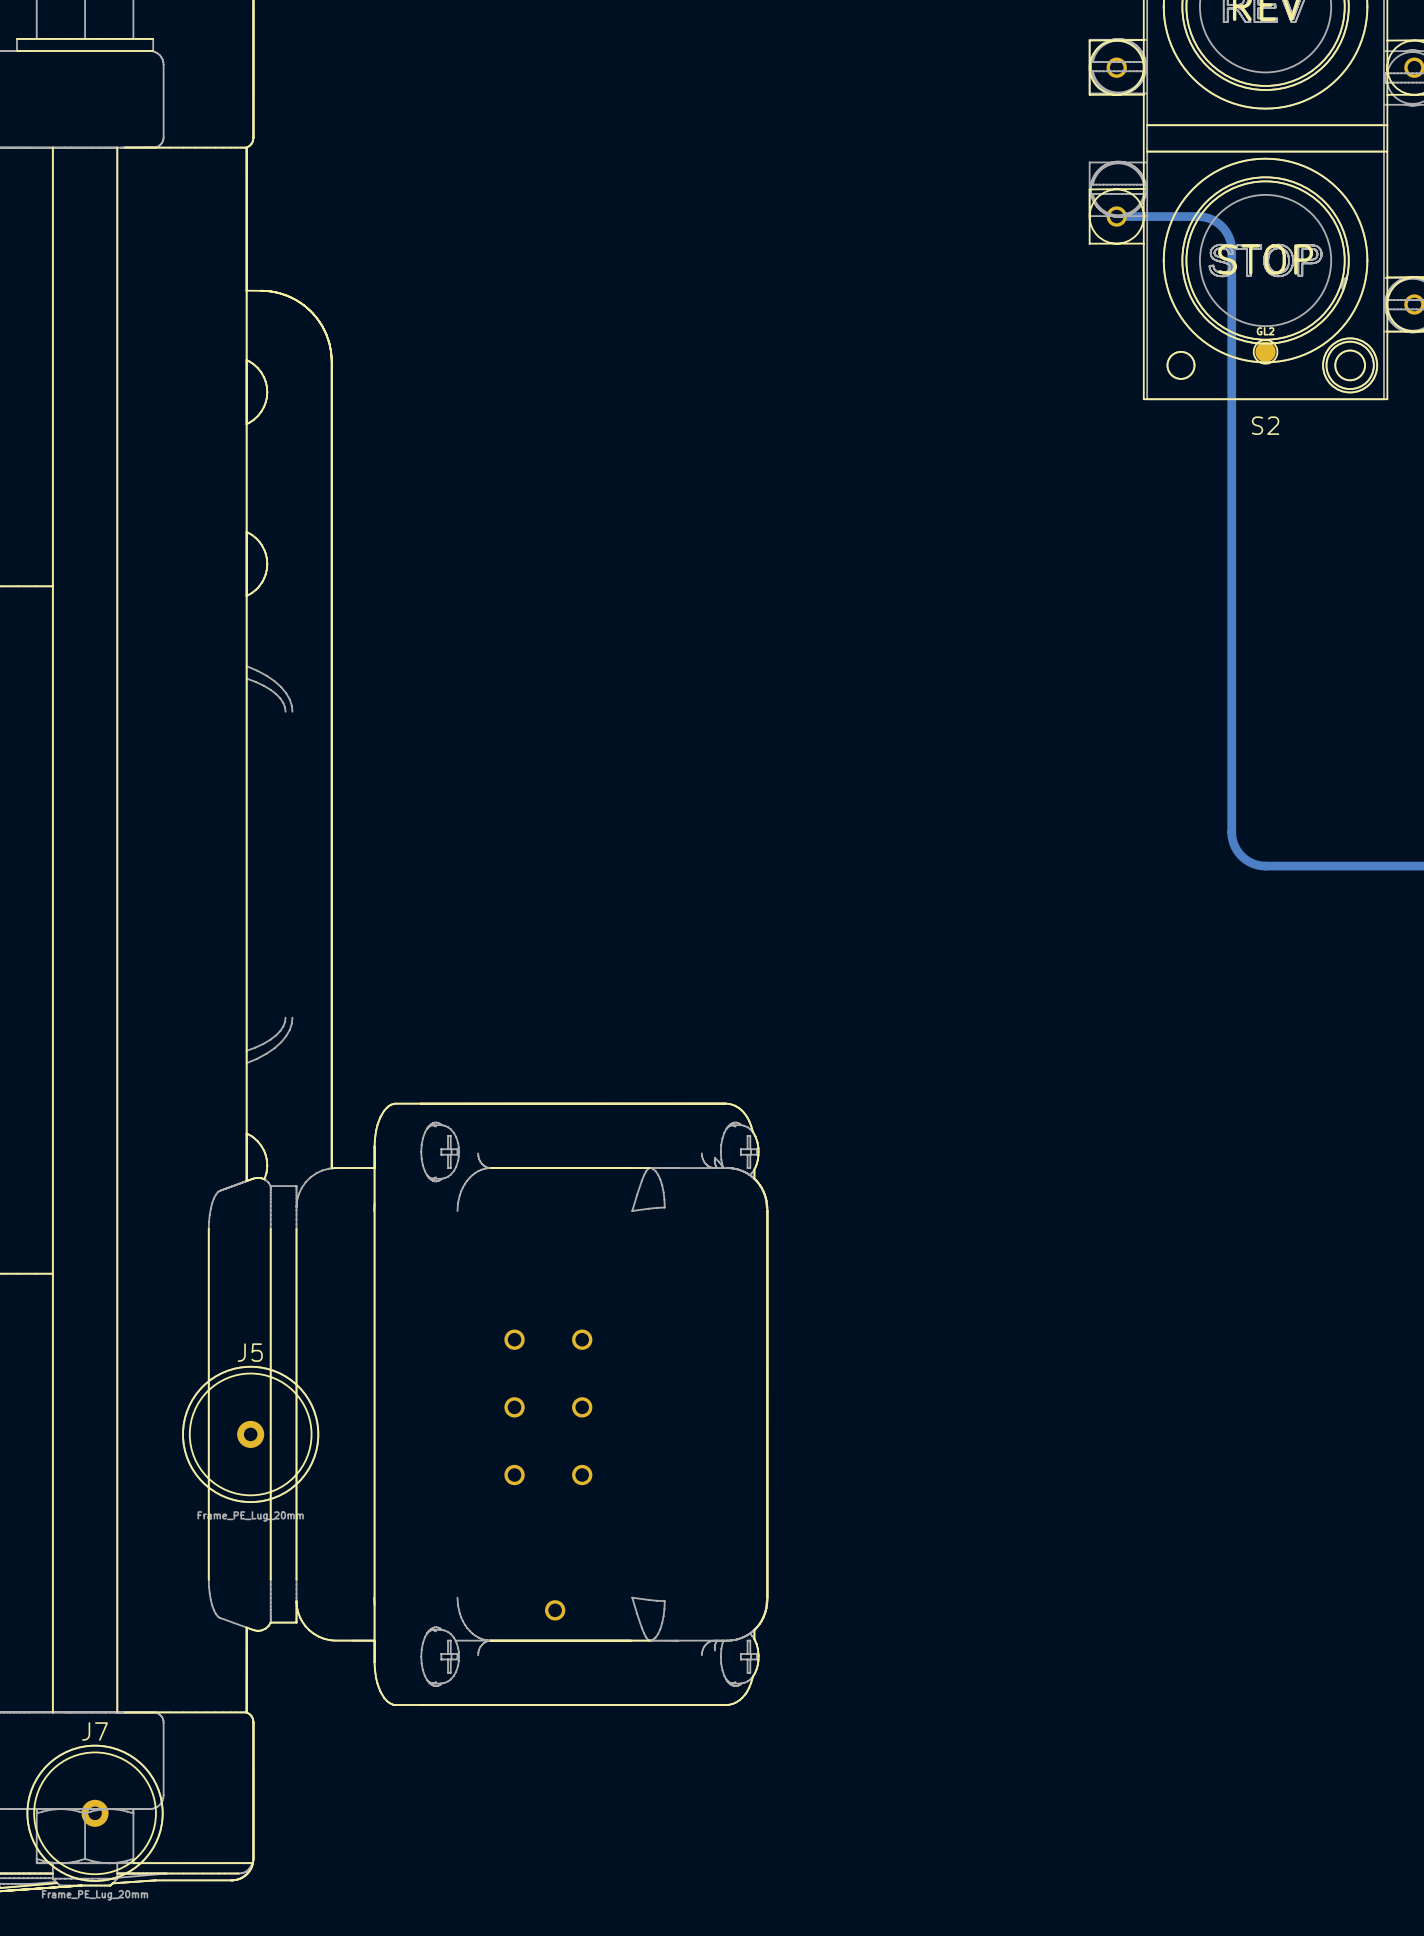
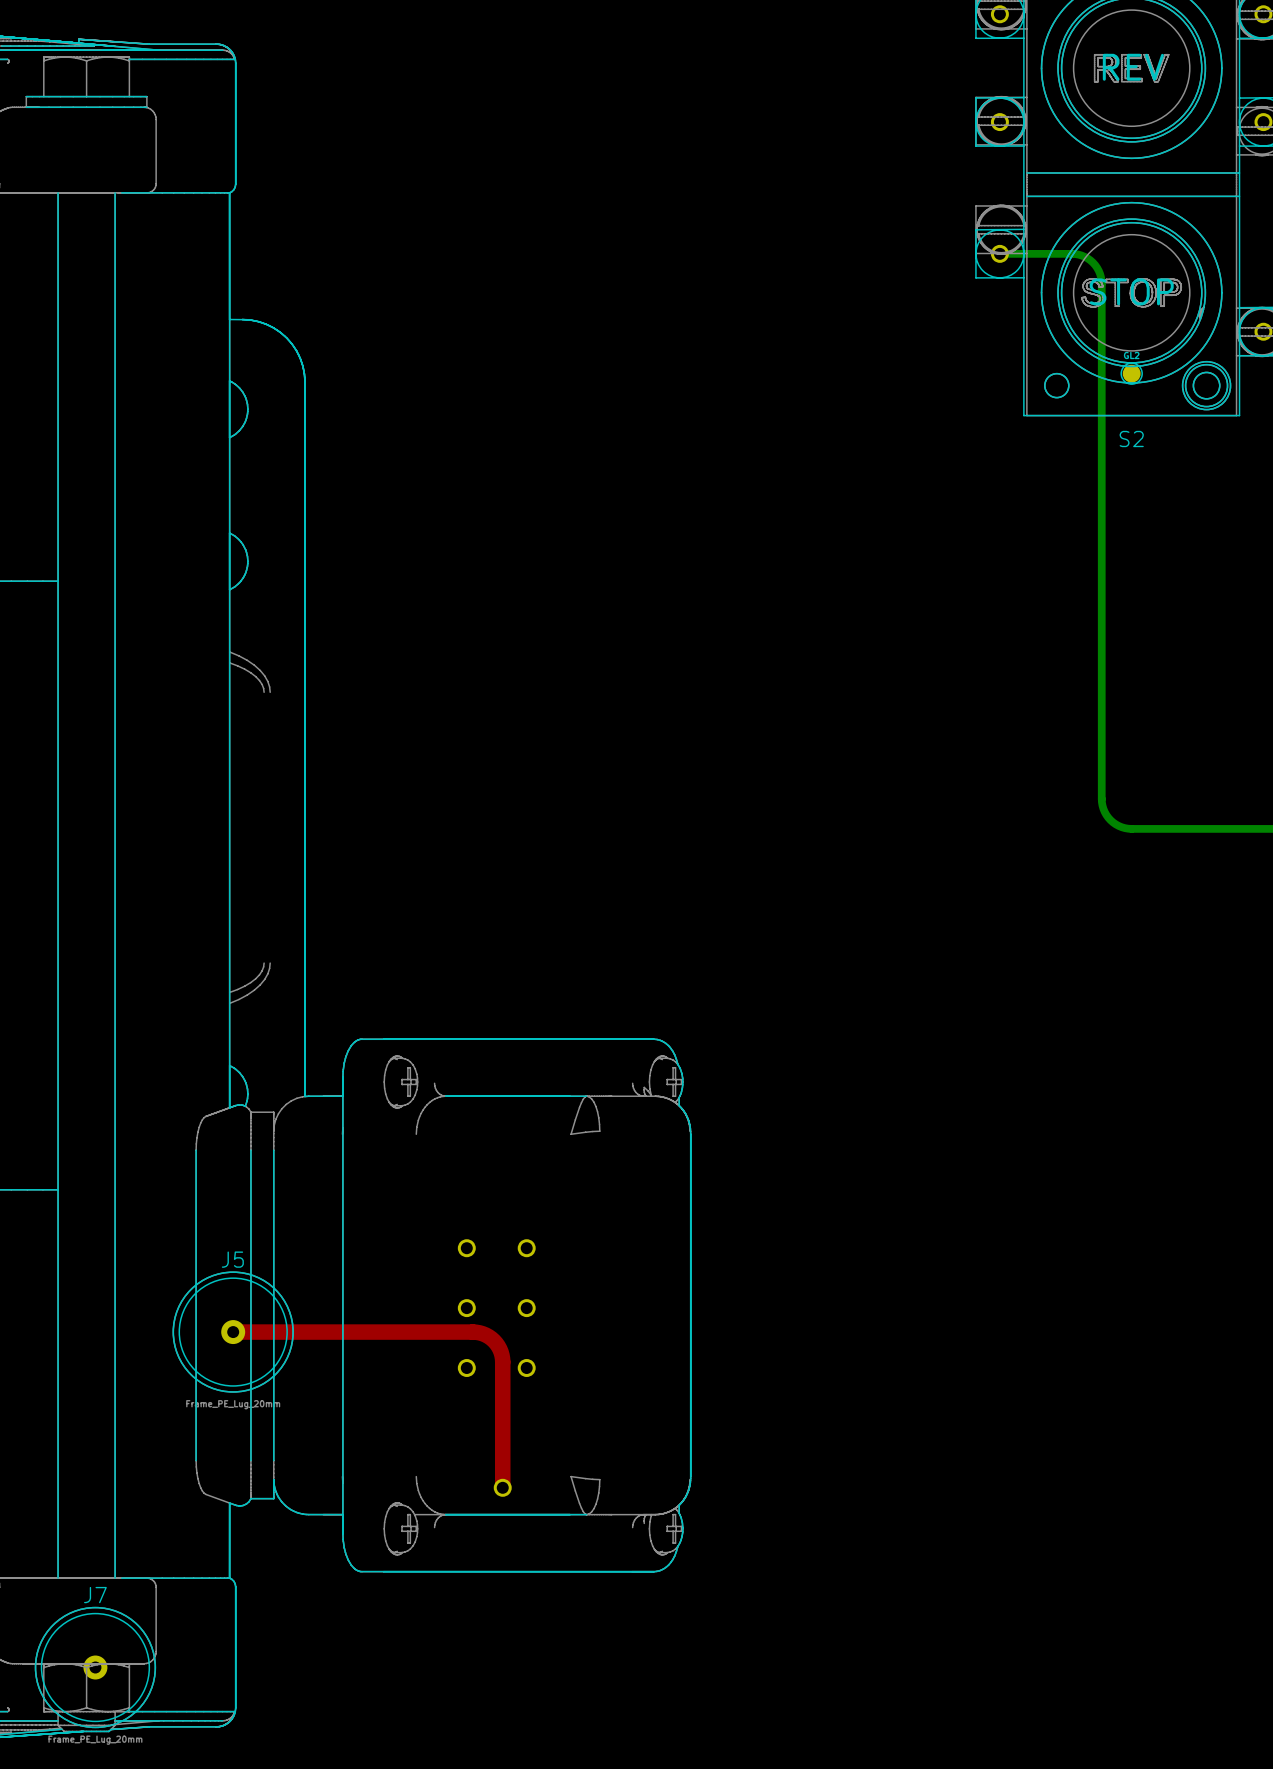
top track: none -> (233, 1332) (472, 1332) (488, 1336) (498, 1346) (502, 1358) (502, 1487)

